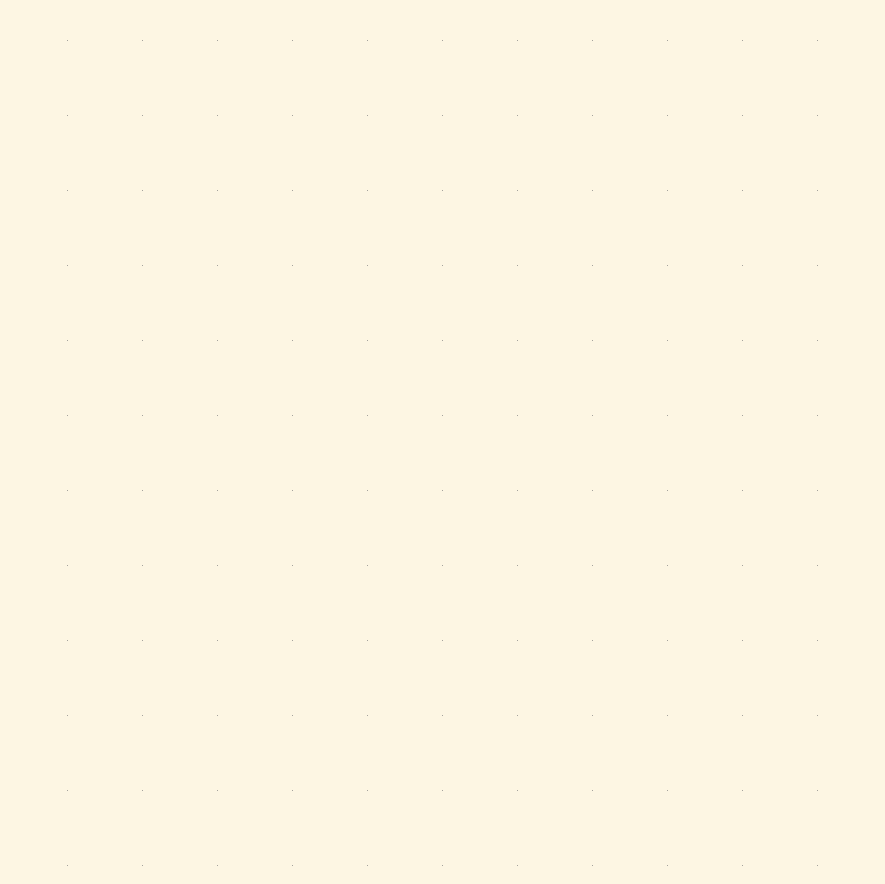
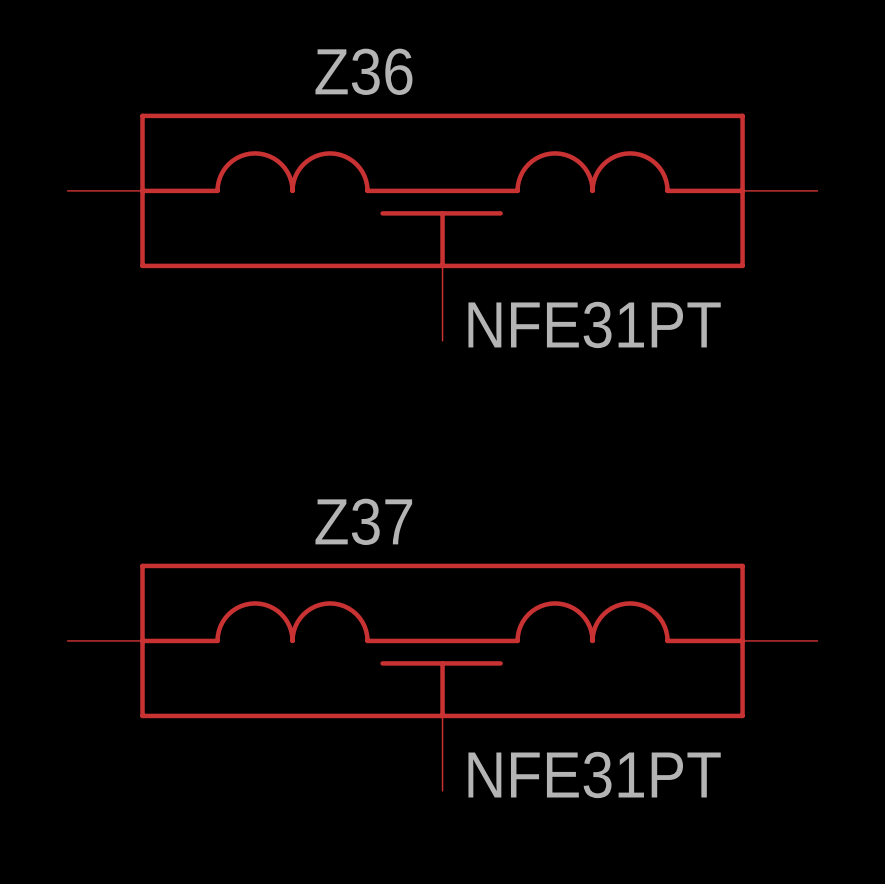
Z36: none -> NFE31PT (442, 227)
Z37: none -> NFE31PT (442, 677)

